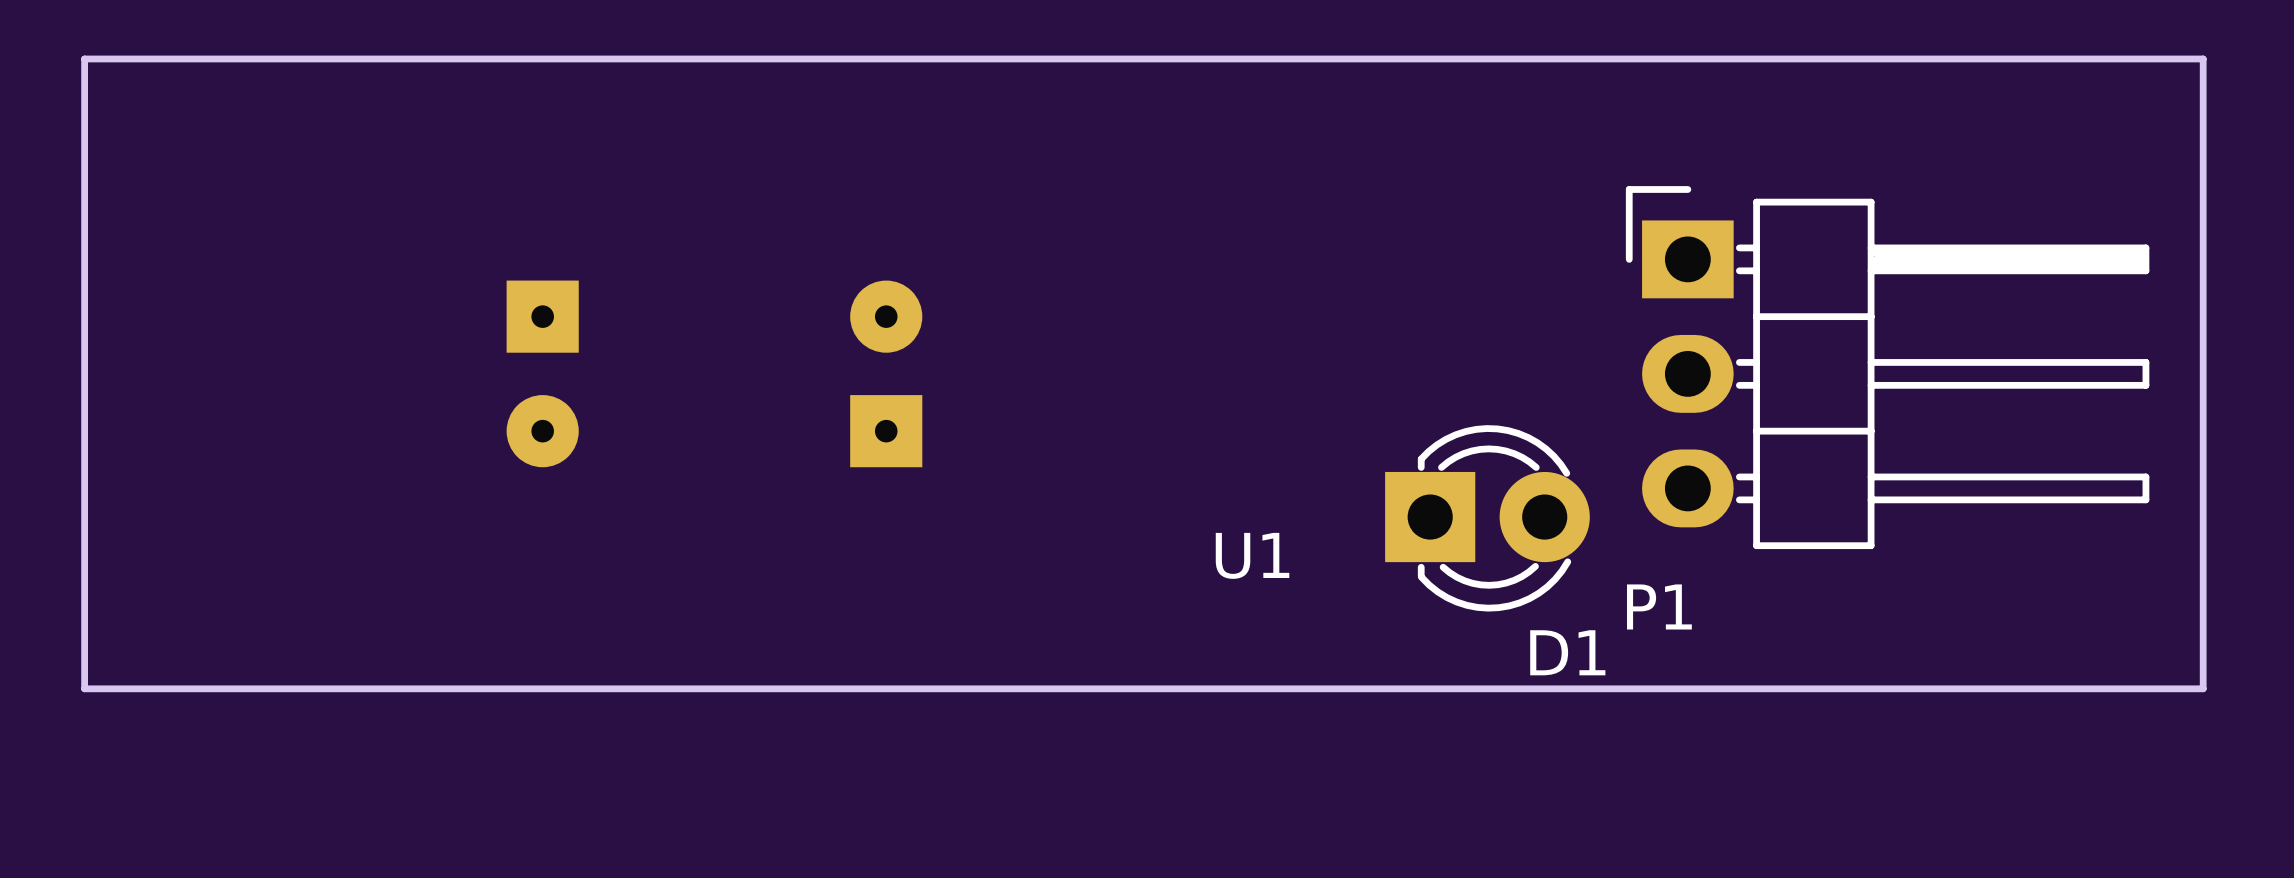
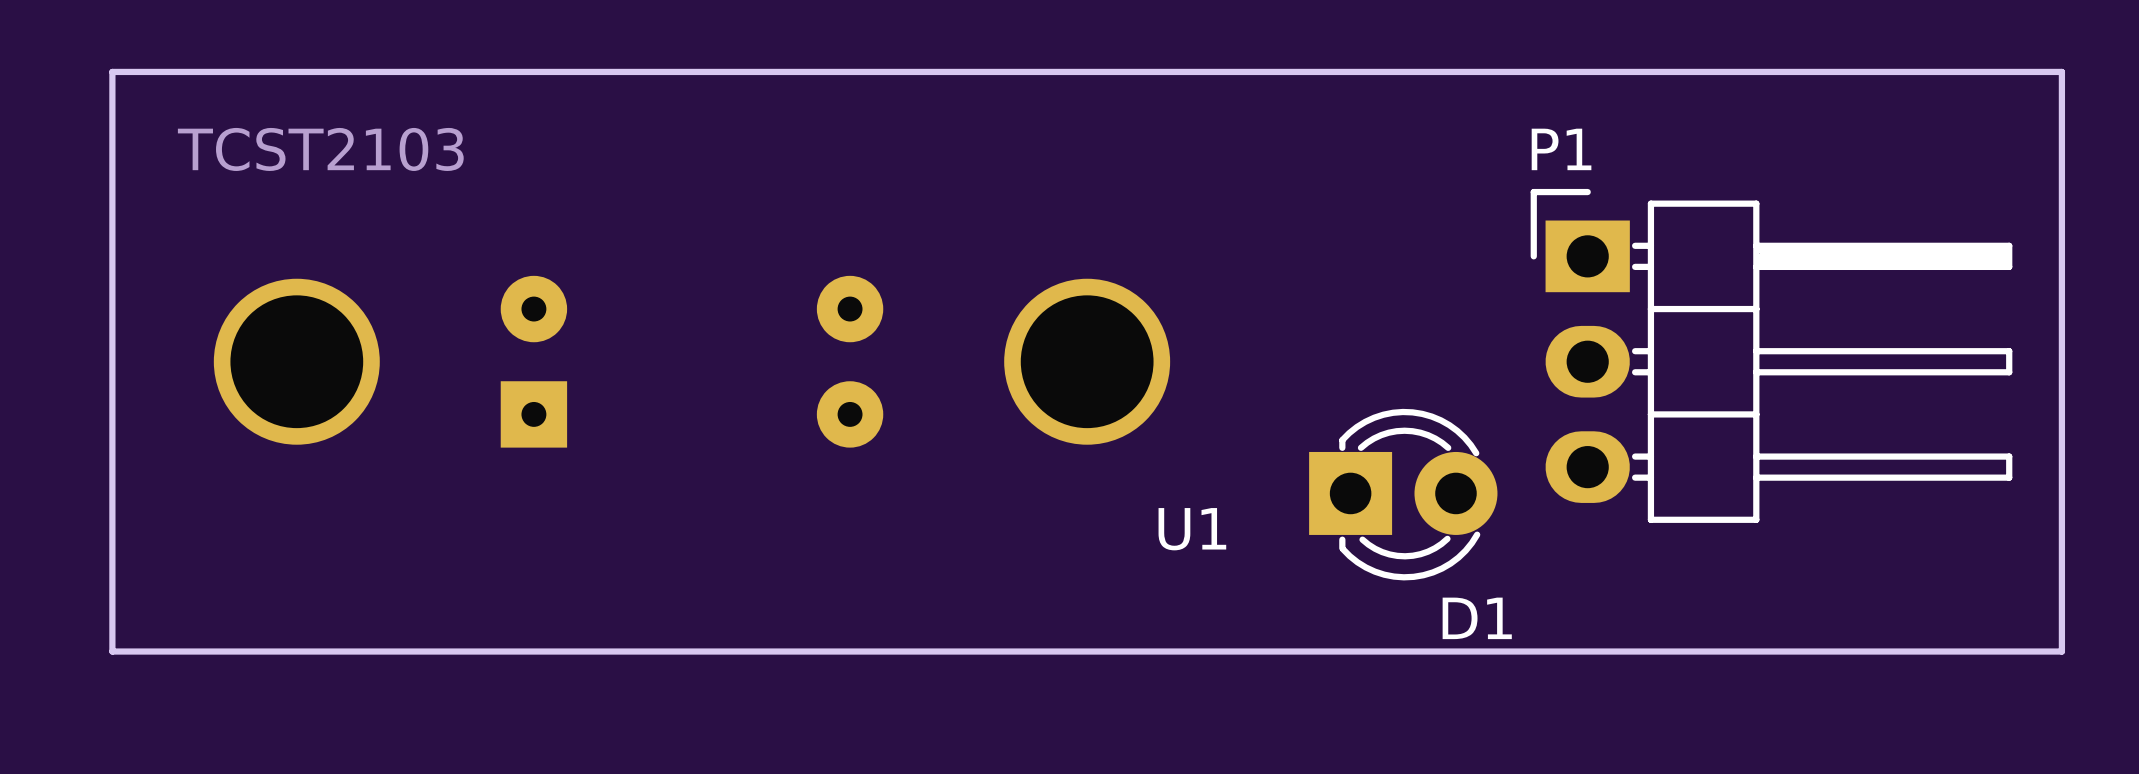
U1 value: none -> TCST2103 (320, 149)
U1 footprint: [506, 280, 923, 468] -> [213, 275, 1171, 448]
P1 name position: P1 (1659, 606) -> P1 (1561, 149)

